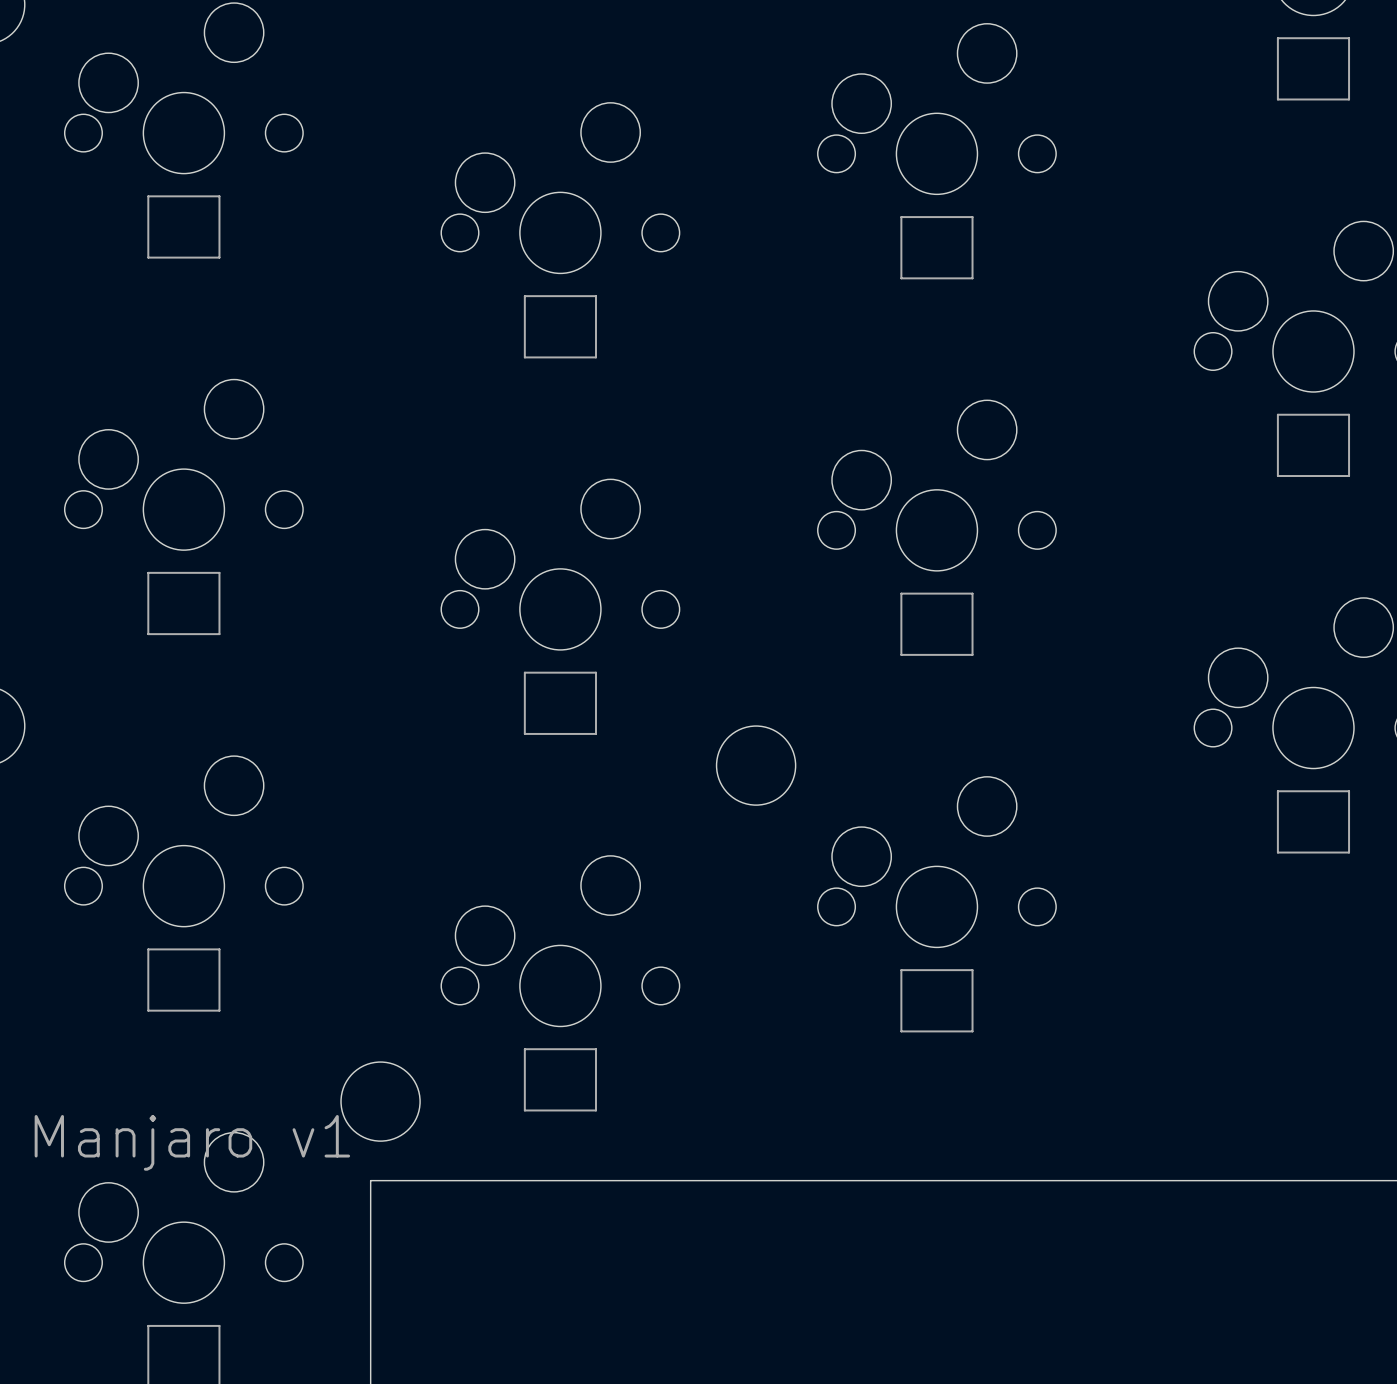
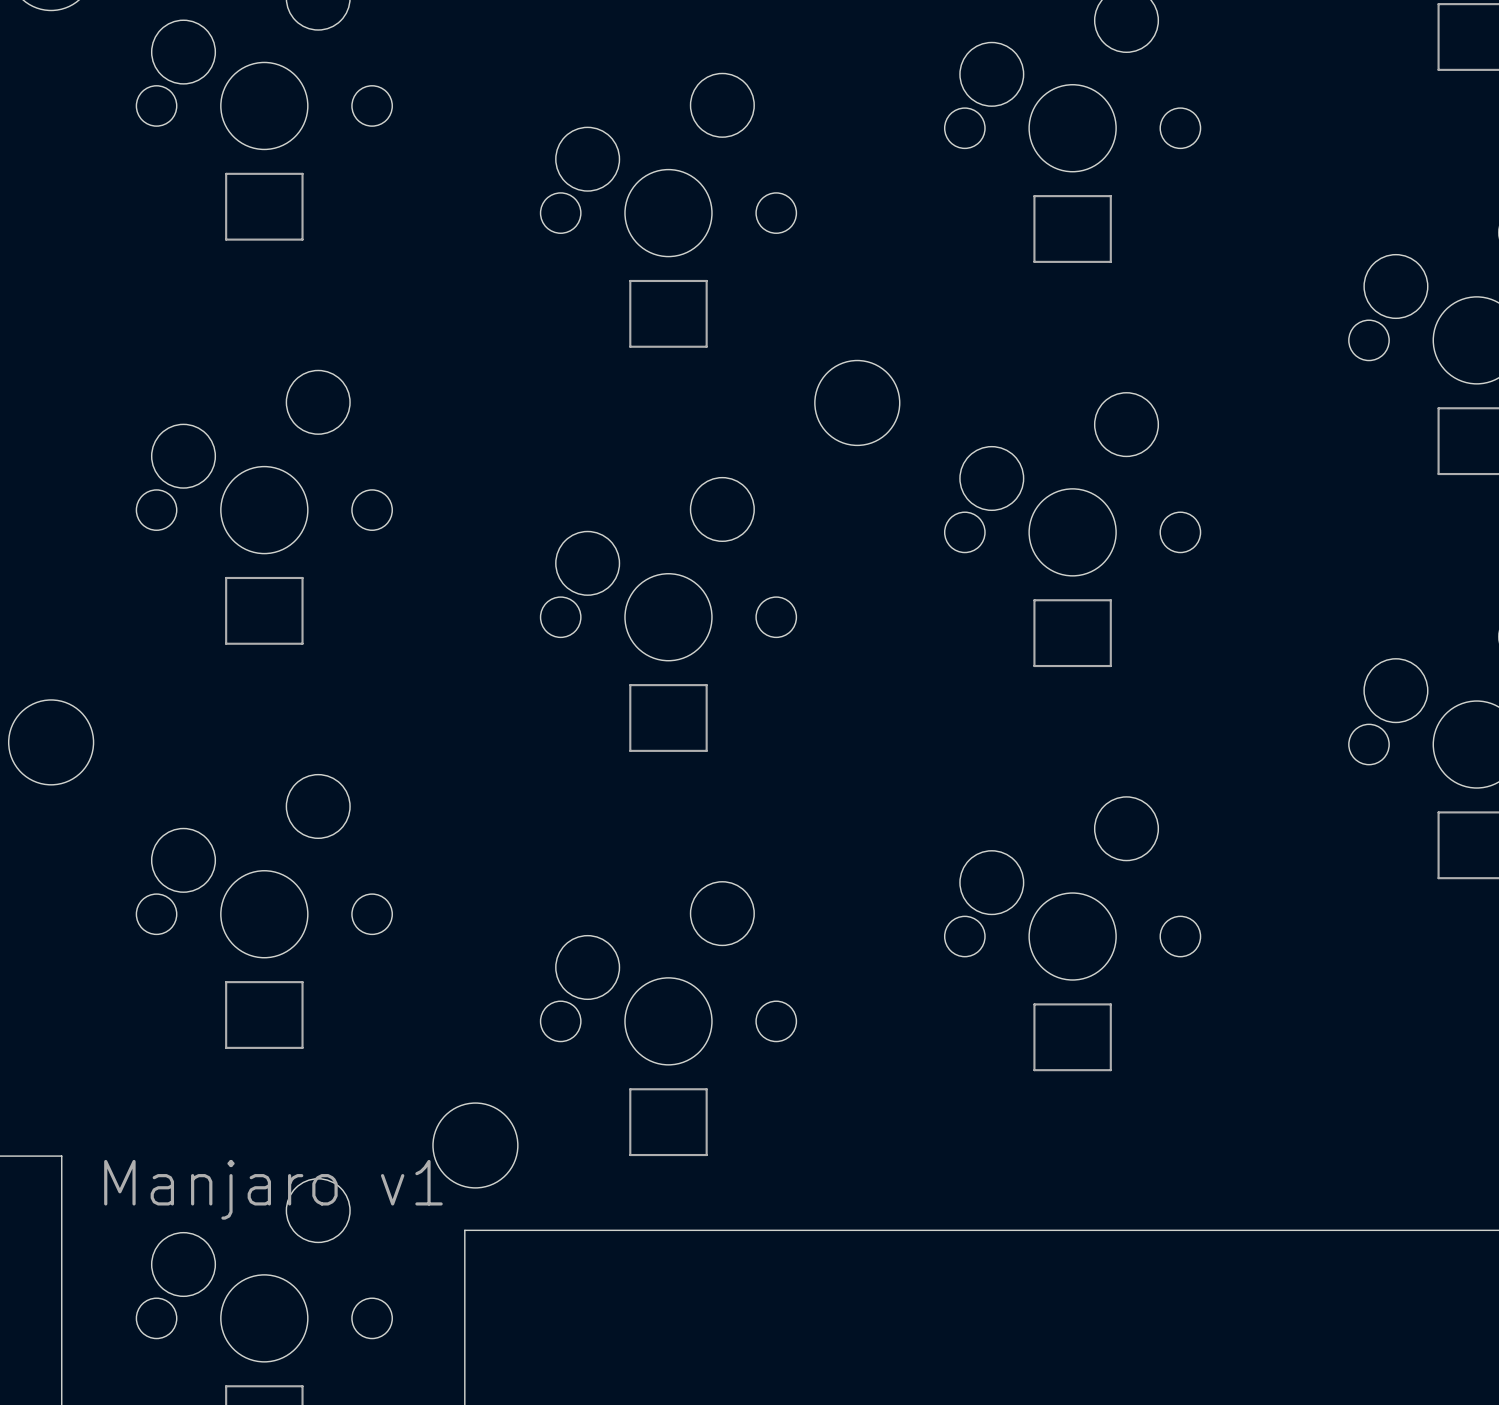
round board edge position: (756, 765) -> (857, 402)

